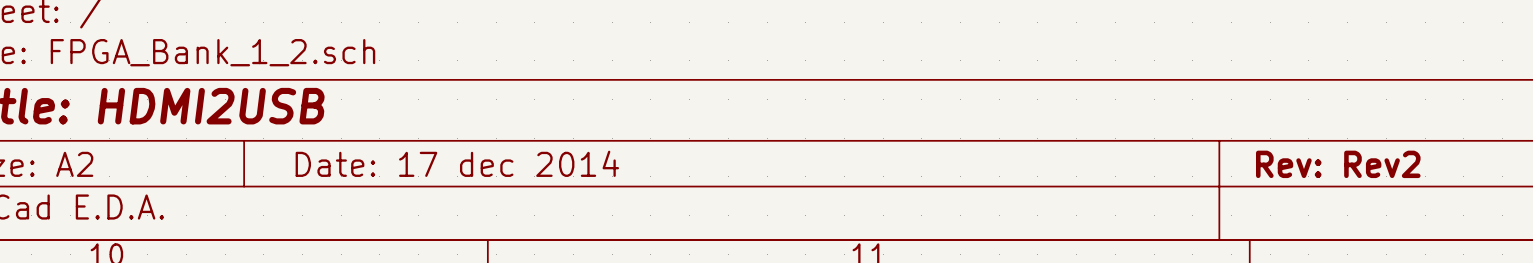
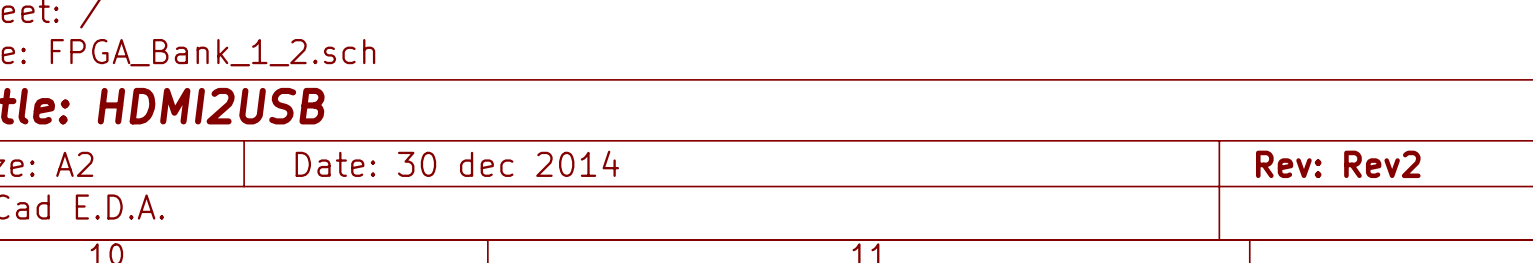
title block: Date: 17 dec 2014 (457, 163) -> Date: 30 dec 2014 (457, 163)

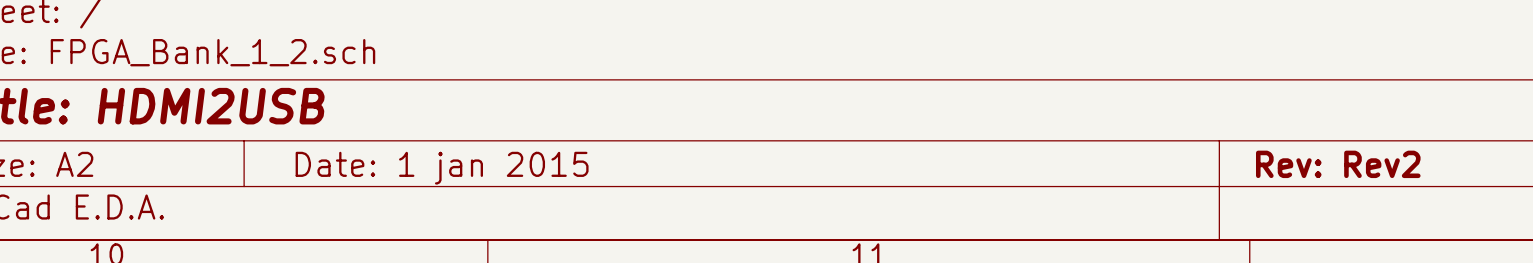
title block: Date: 30 dec 2014 (457, 163) -> Date: 1 jan 2015 (442, 168)

